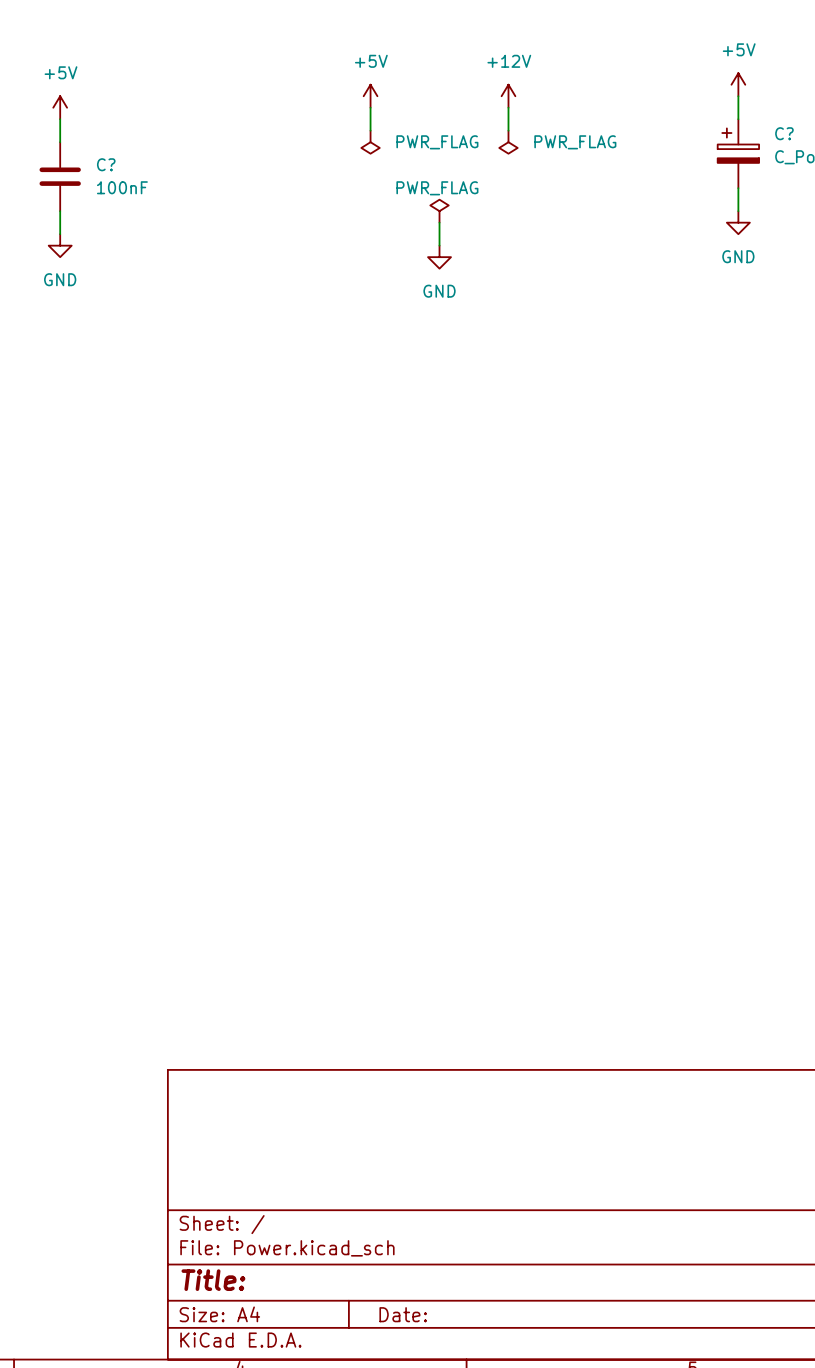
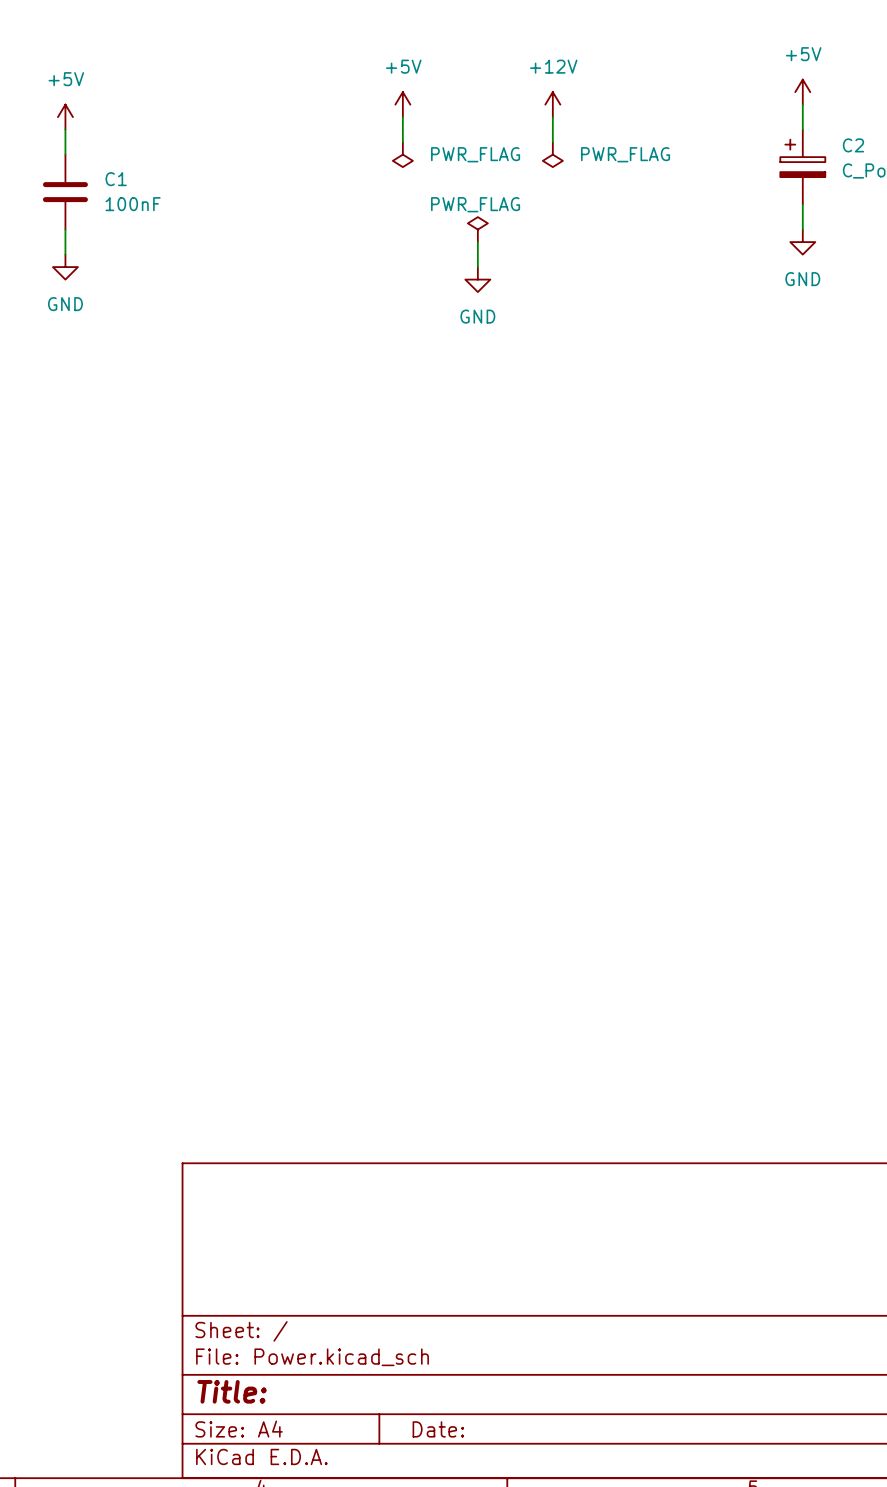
C? name: C? (784, 133) -> C2 (853, 145)
C? name: C? (106, 164) -> C1 (116, 179)

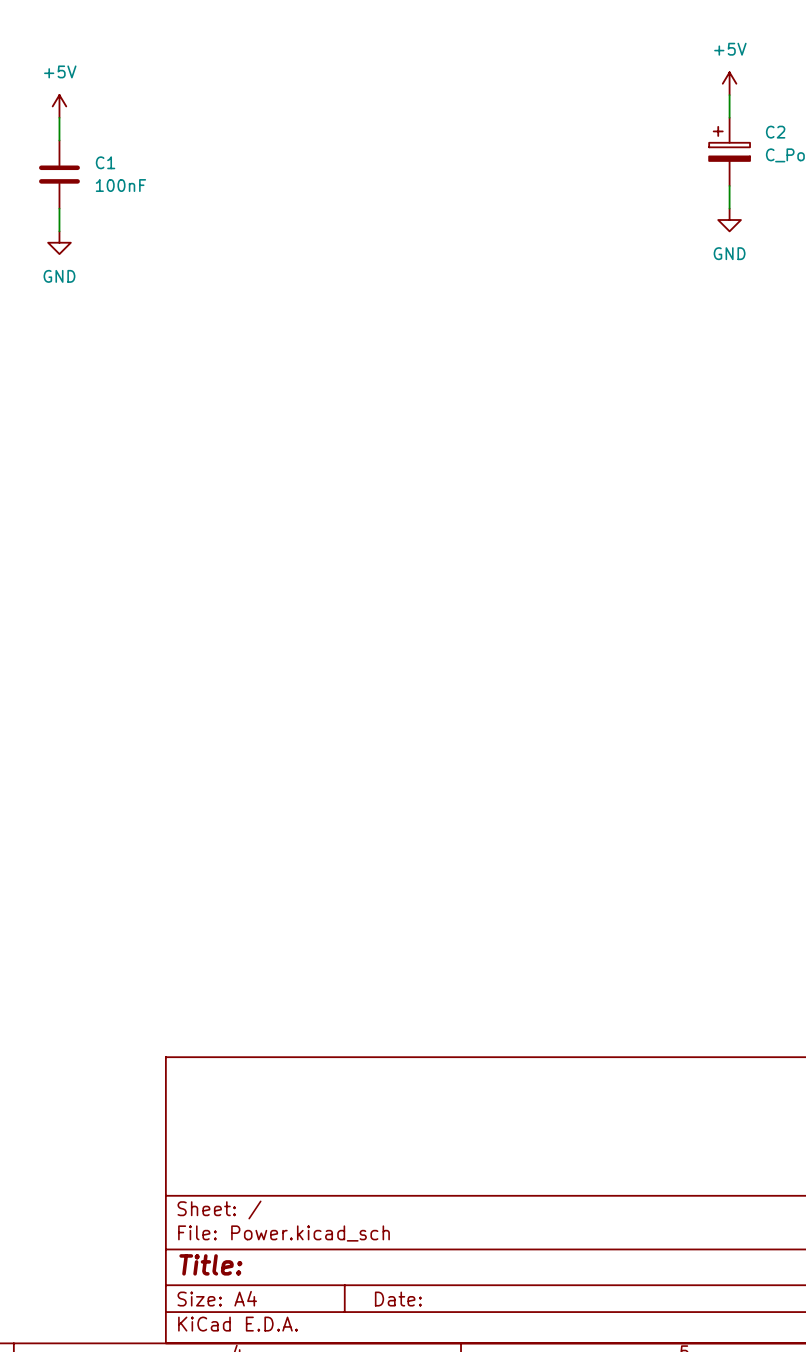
power symbol: +5V (402, 104) -> none
power symbol: +12V (552, 104) -> none
wire: (402, 117) (402, 142) -> none
wire: (552, 117) (552, 142) -> none
power symbol: PWR_FLAG (402, 154) -> none
power symbol: PWR_FLAG (552, 154) -> none
power symbol: PWR_FLAG (477, 229) -> none
wire: (477, 242) (477, 267) -> none
power symbol: GND (477, 279) -> none

